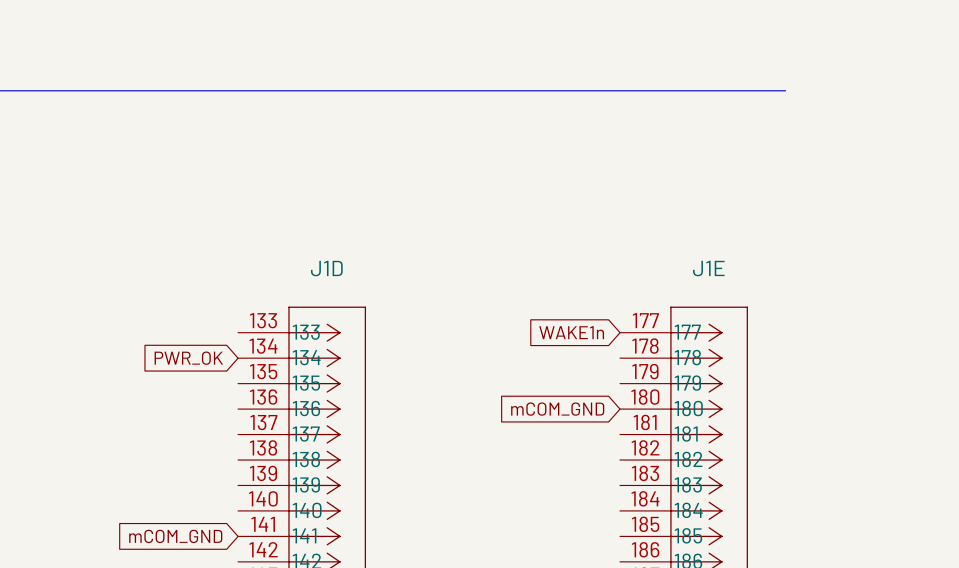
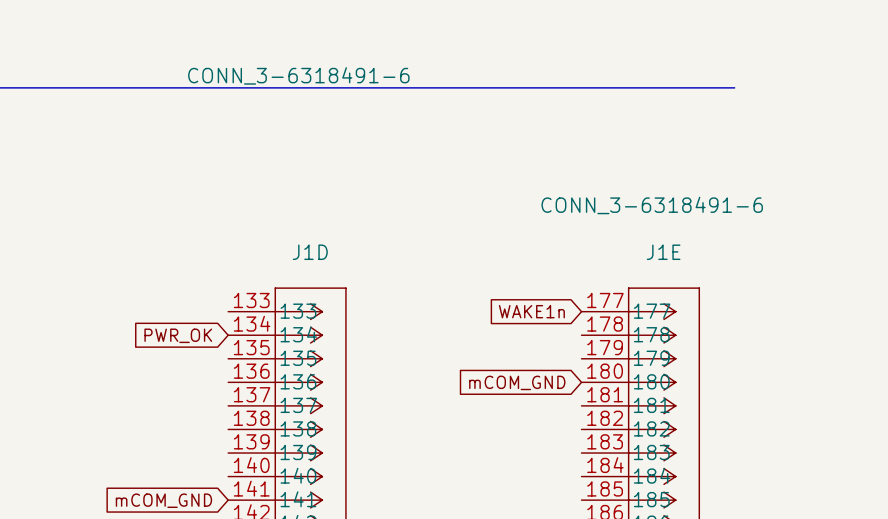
J1D value: none -> CONN_3-6318491-6 (298, 75)
J1E value: none -> CONN_3-6318491-6 (652, 205)

